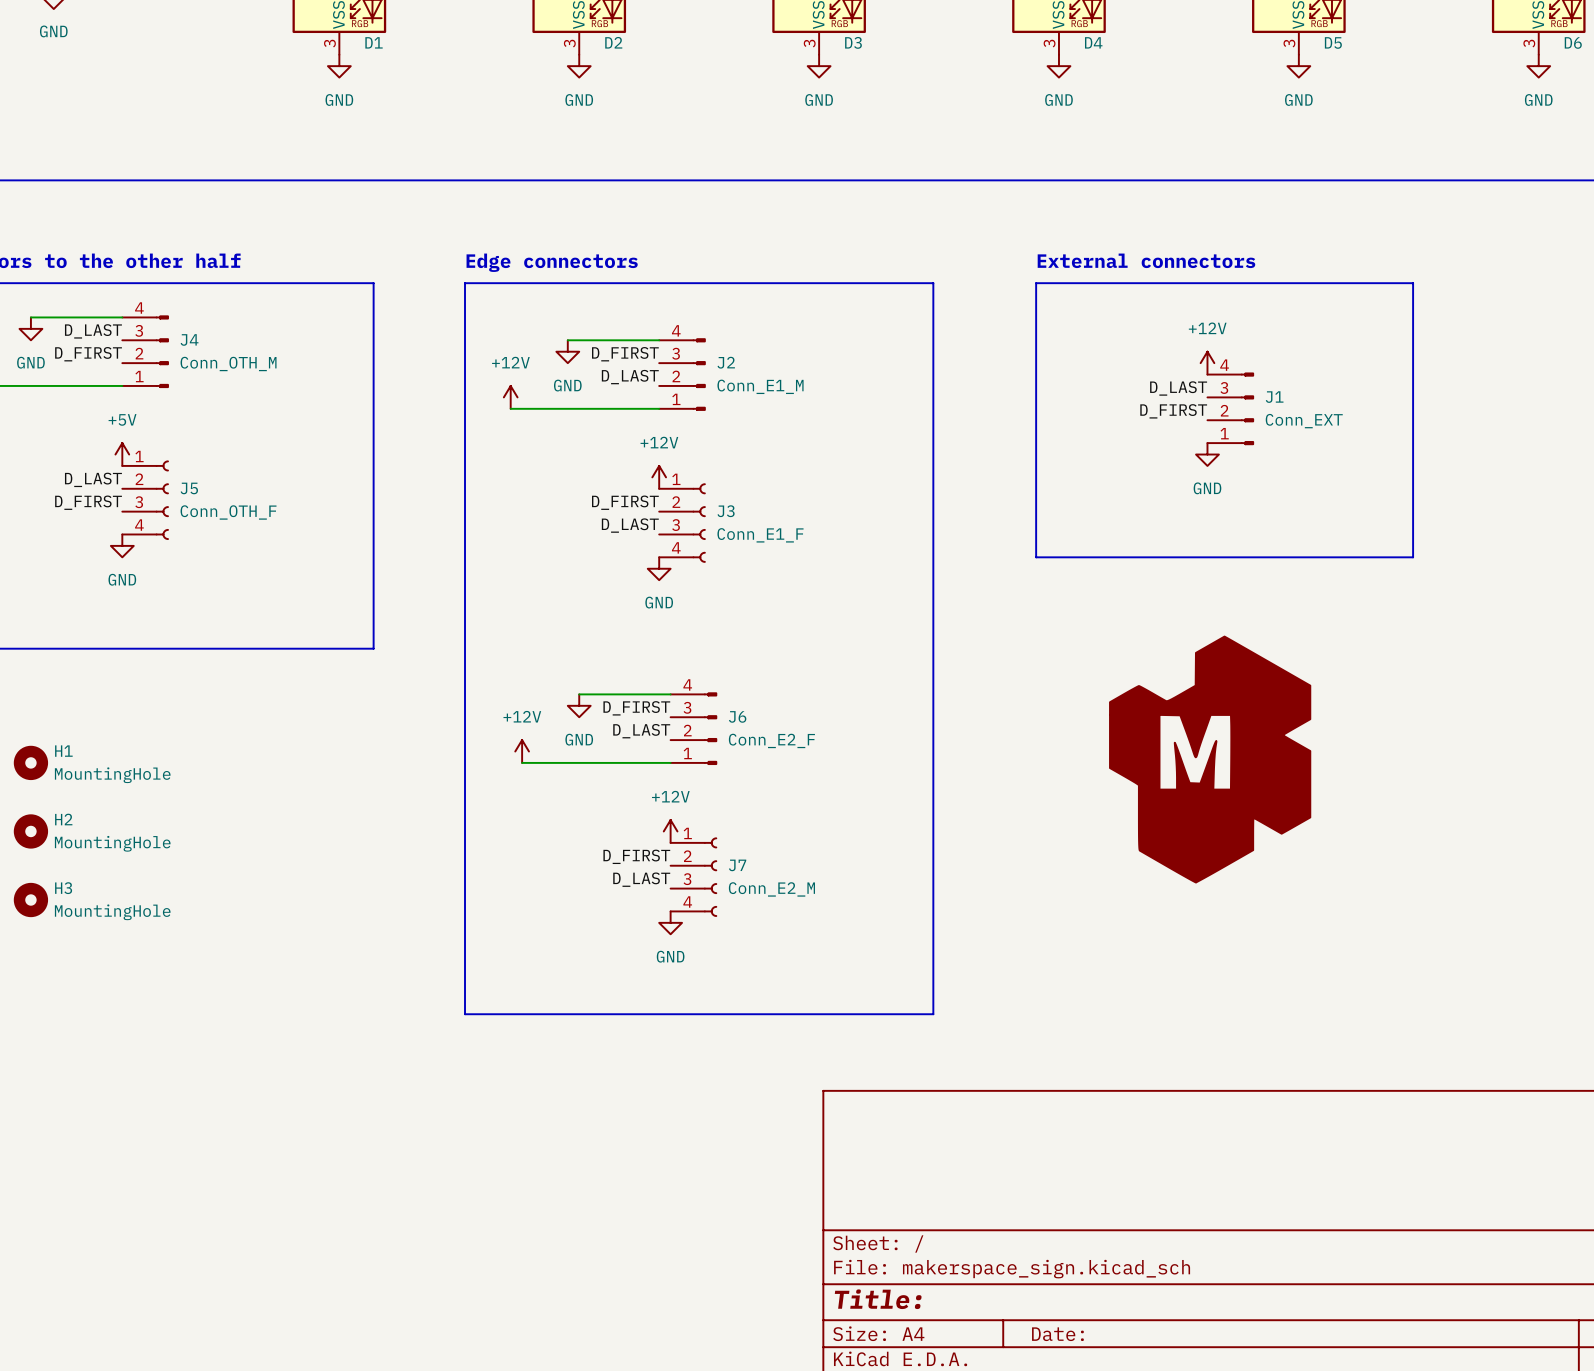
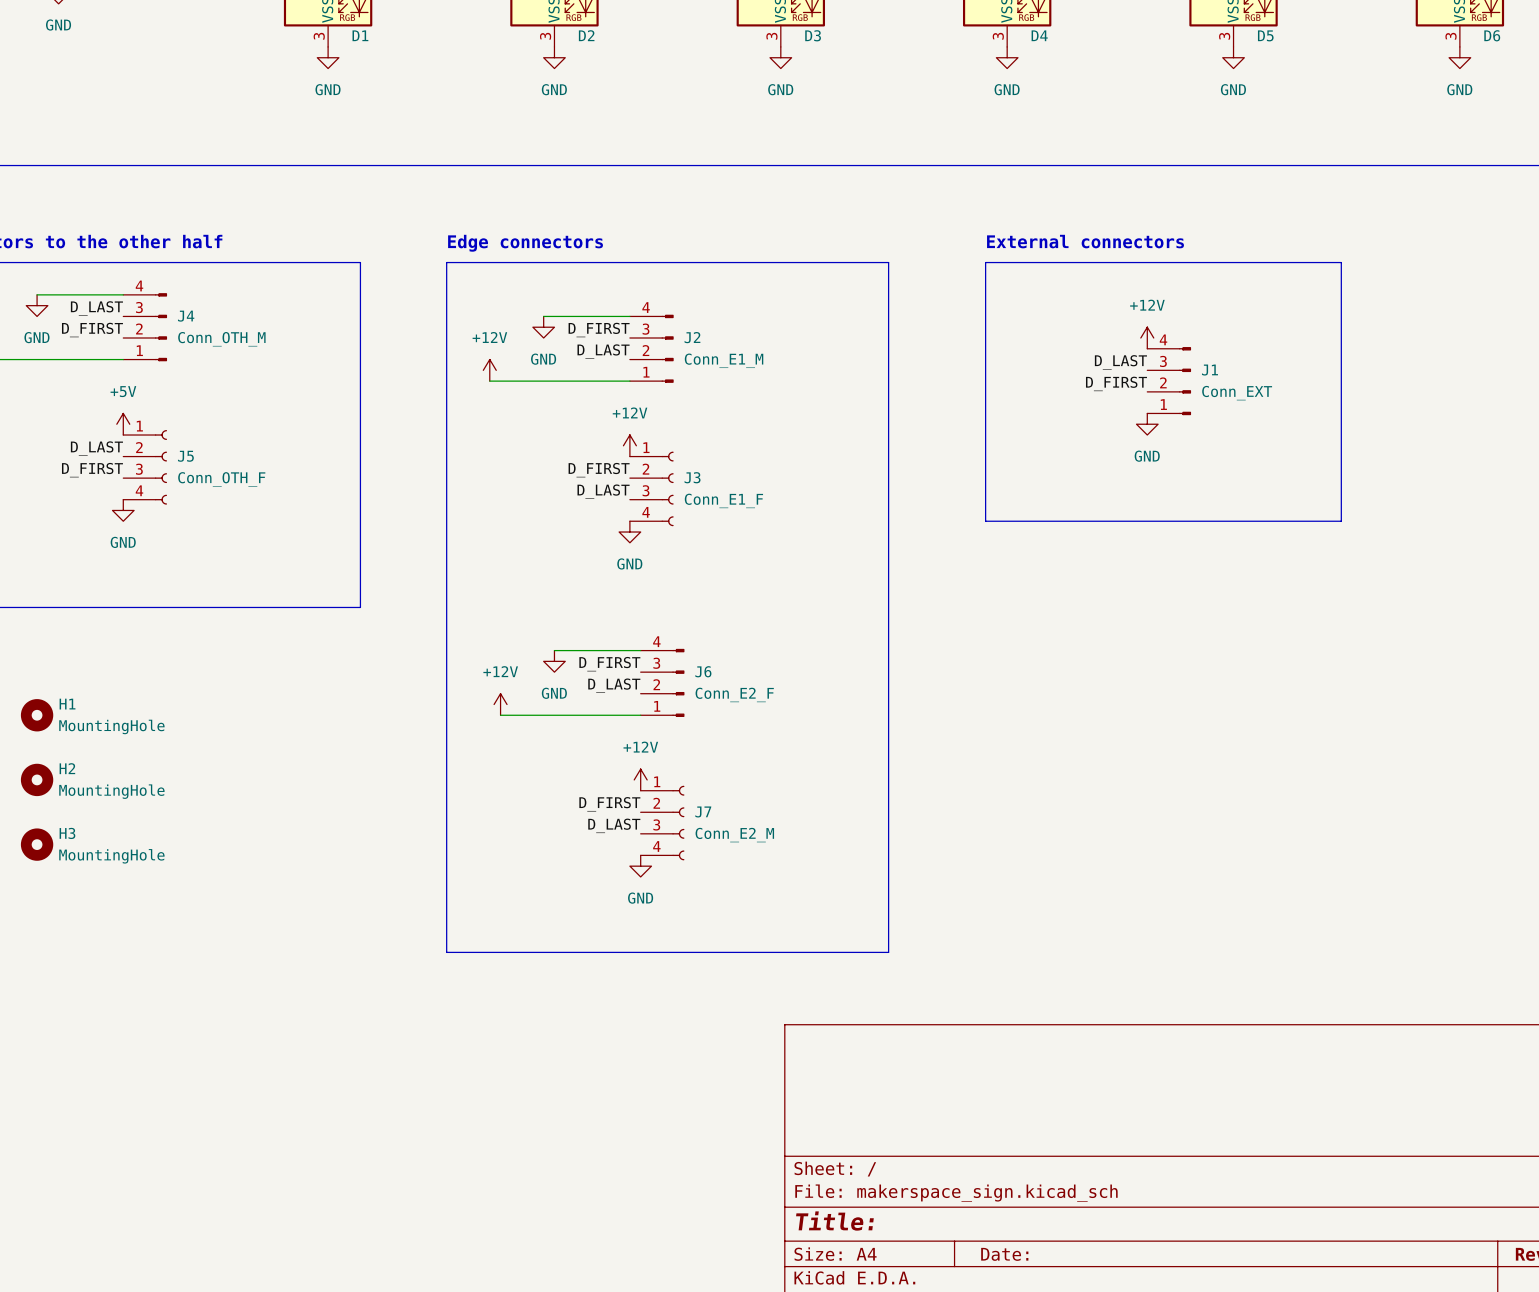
drawing: [1109, 636, 1311, 883] -> none

